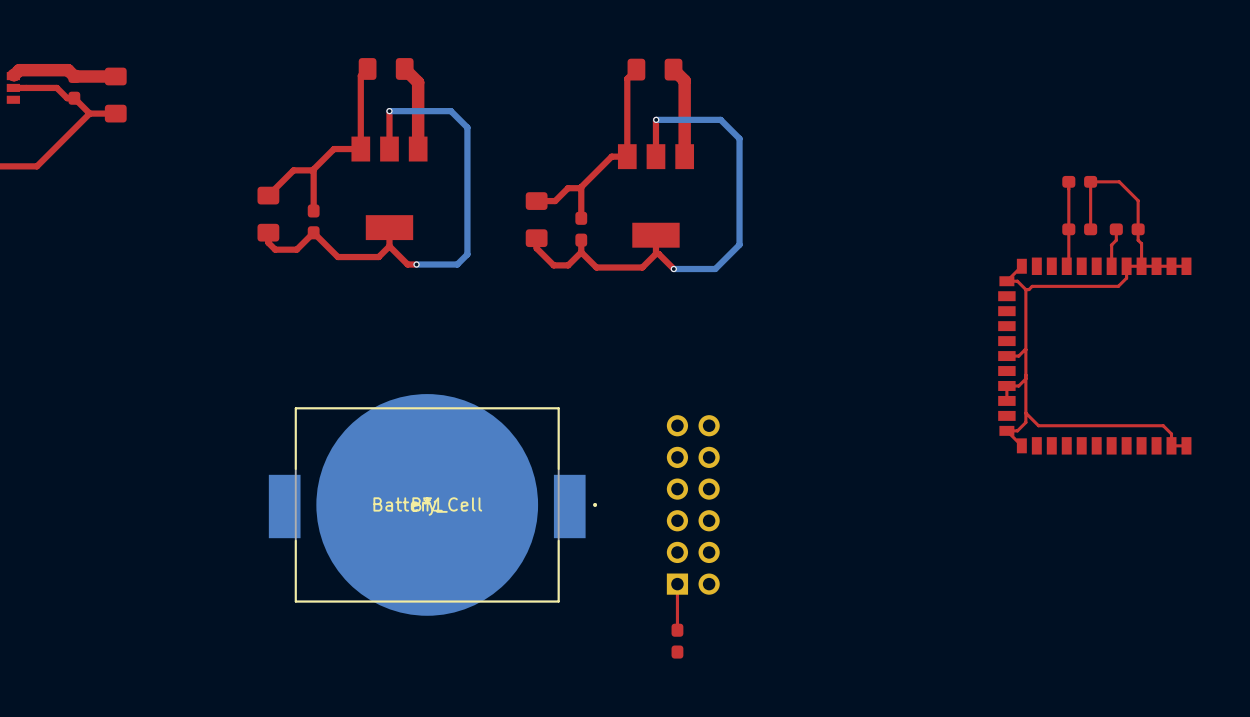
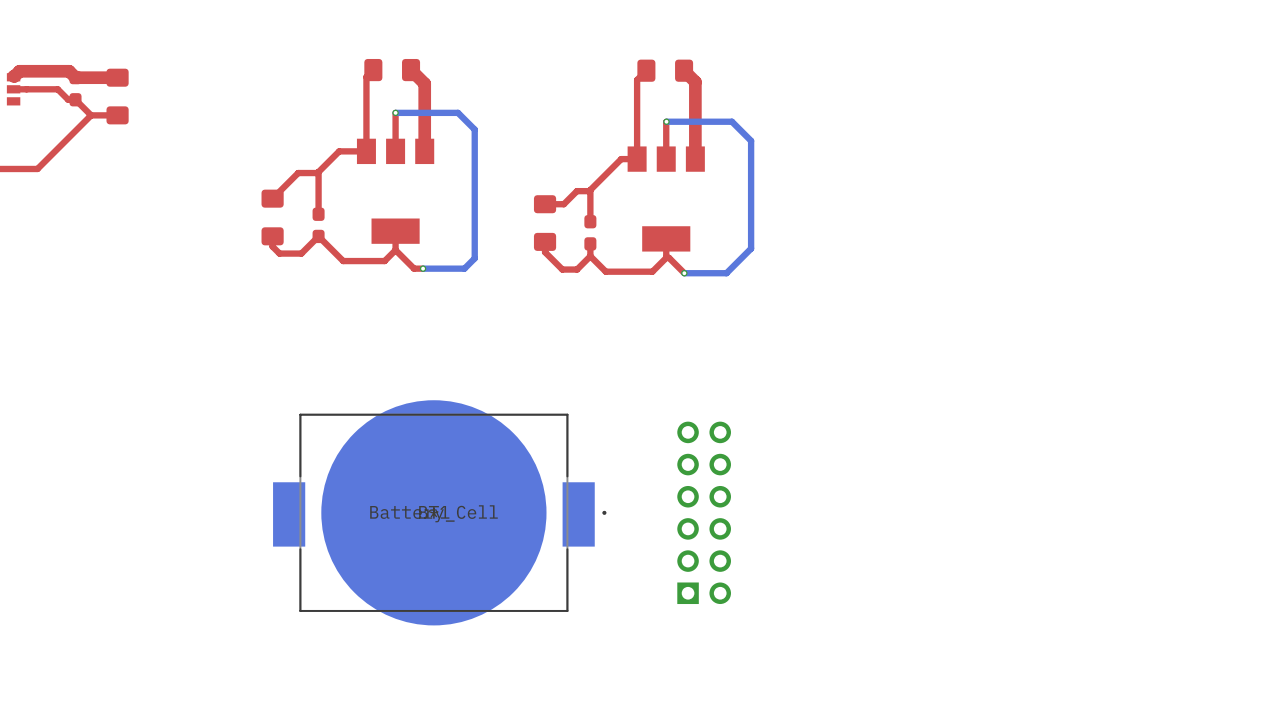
top track: (1068, 181) (1068, 264) (1066, 266) -> none
part: (1079, 181) -> none
part: (1079, 229) -> none
top track: (1090, 229) (1090, 181) (1119, 181) (1138, 200) (1138, 240) (1141, 243) (1141, 259) -> none
top track: (1116, 229) (1116, 240) (1111, 245) (1111, 260) -> none
part: (1127, 229) -> none
top track: (1021, 266) (1006, 281) (1017, 281) (1025, 289) -> none
top track: (1186, 266) (1126, 266) (1126, 278) (1118, 286) (1032, 286) (1025, 289) -> none
top track: (1025, 289) (1025, 422) (1017, 430) (1006, 430) (1021, 445) -> none
top track: (1025, 349) (1018, 356) (1006, 356) -> none
part: (1094, 356) -> none
top track: (1025, 378) (1018, 385) (1006, 385) (1006, 400) -> none
top track: (1025, 413) (1038, 425) (1163, 425) (1171, 433) (1171, 445) (1186, 445) -> none
top track: (677, 584) (677, 630) -> none
part: (677, 641) -> none

